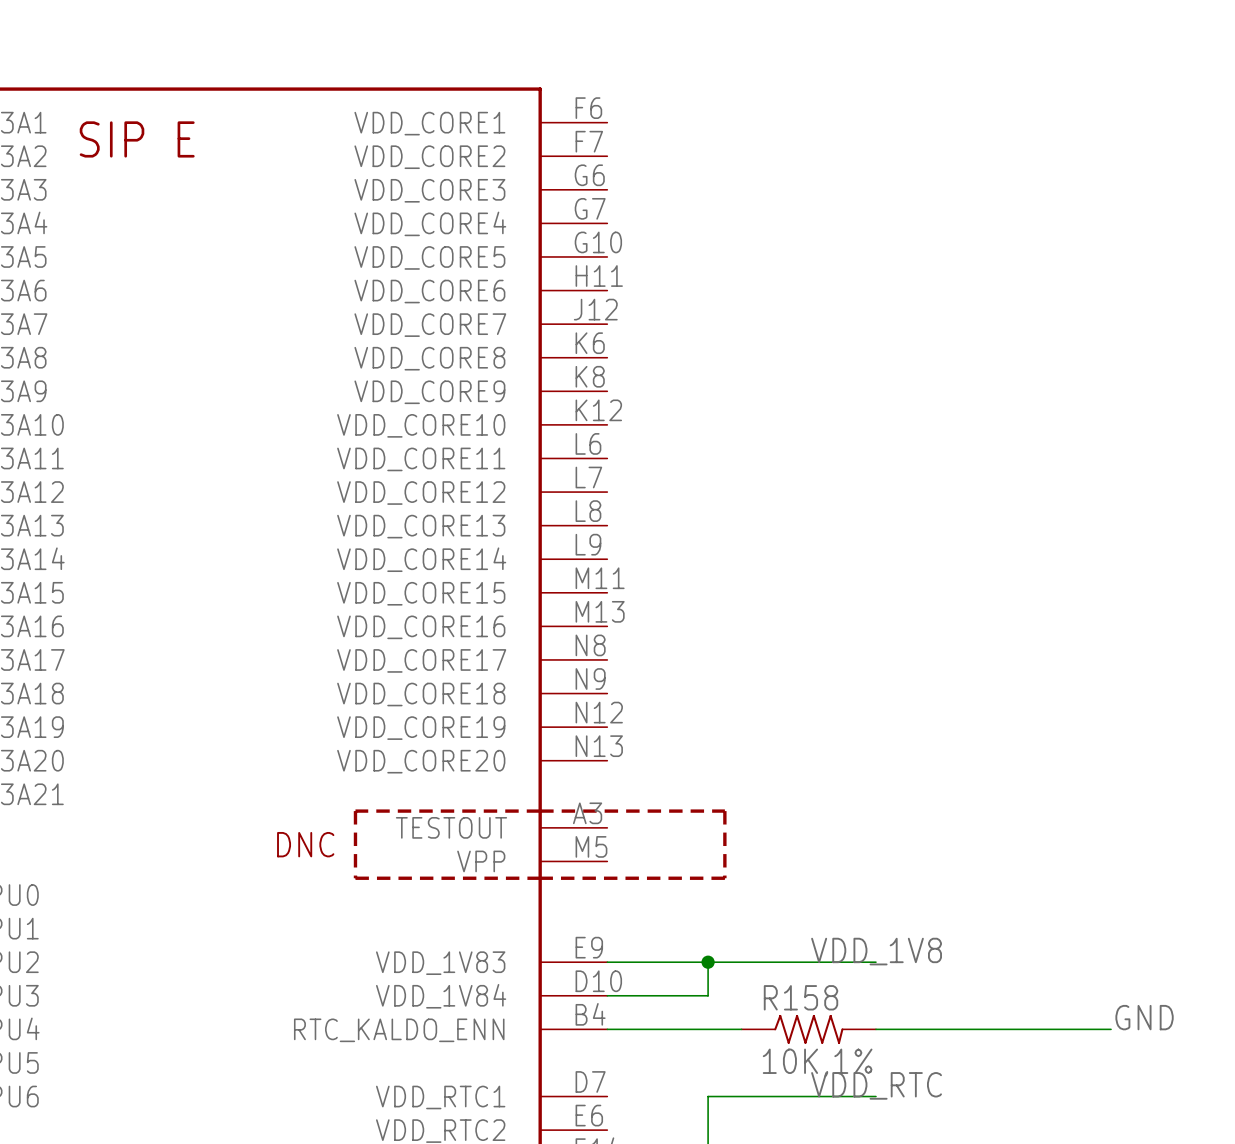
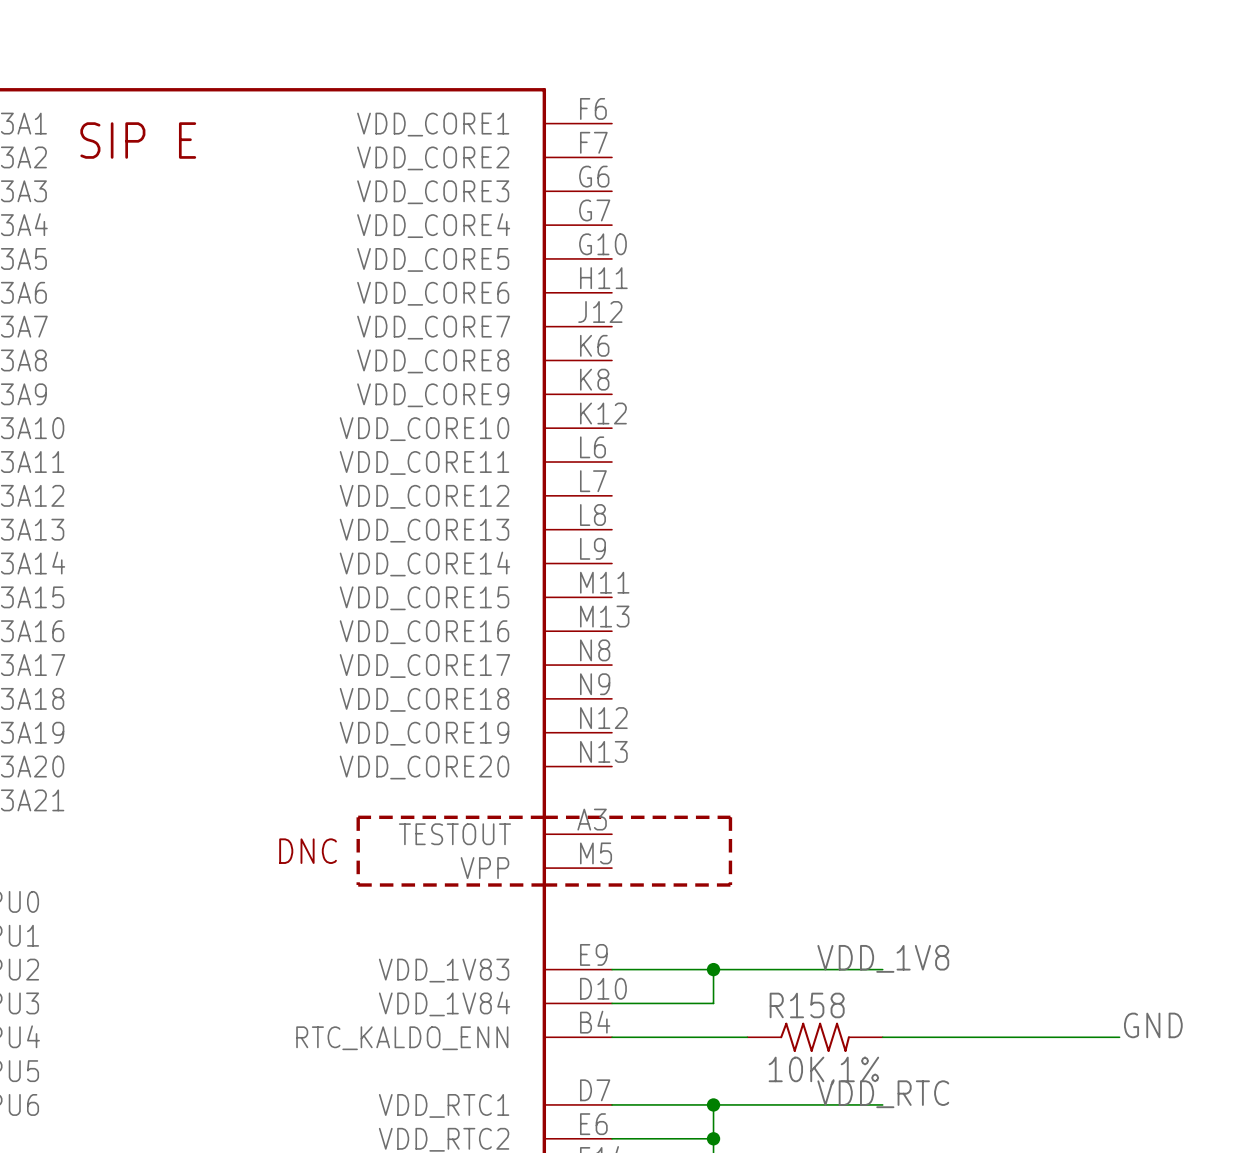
wire: none -> (612, 1104) (713, 1104)
junction: none -> (713, 1104)
wire: none -> (612, 1138) (713, 1138)
junction: none -> (713, 1138)

